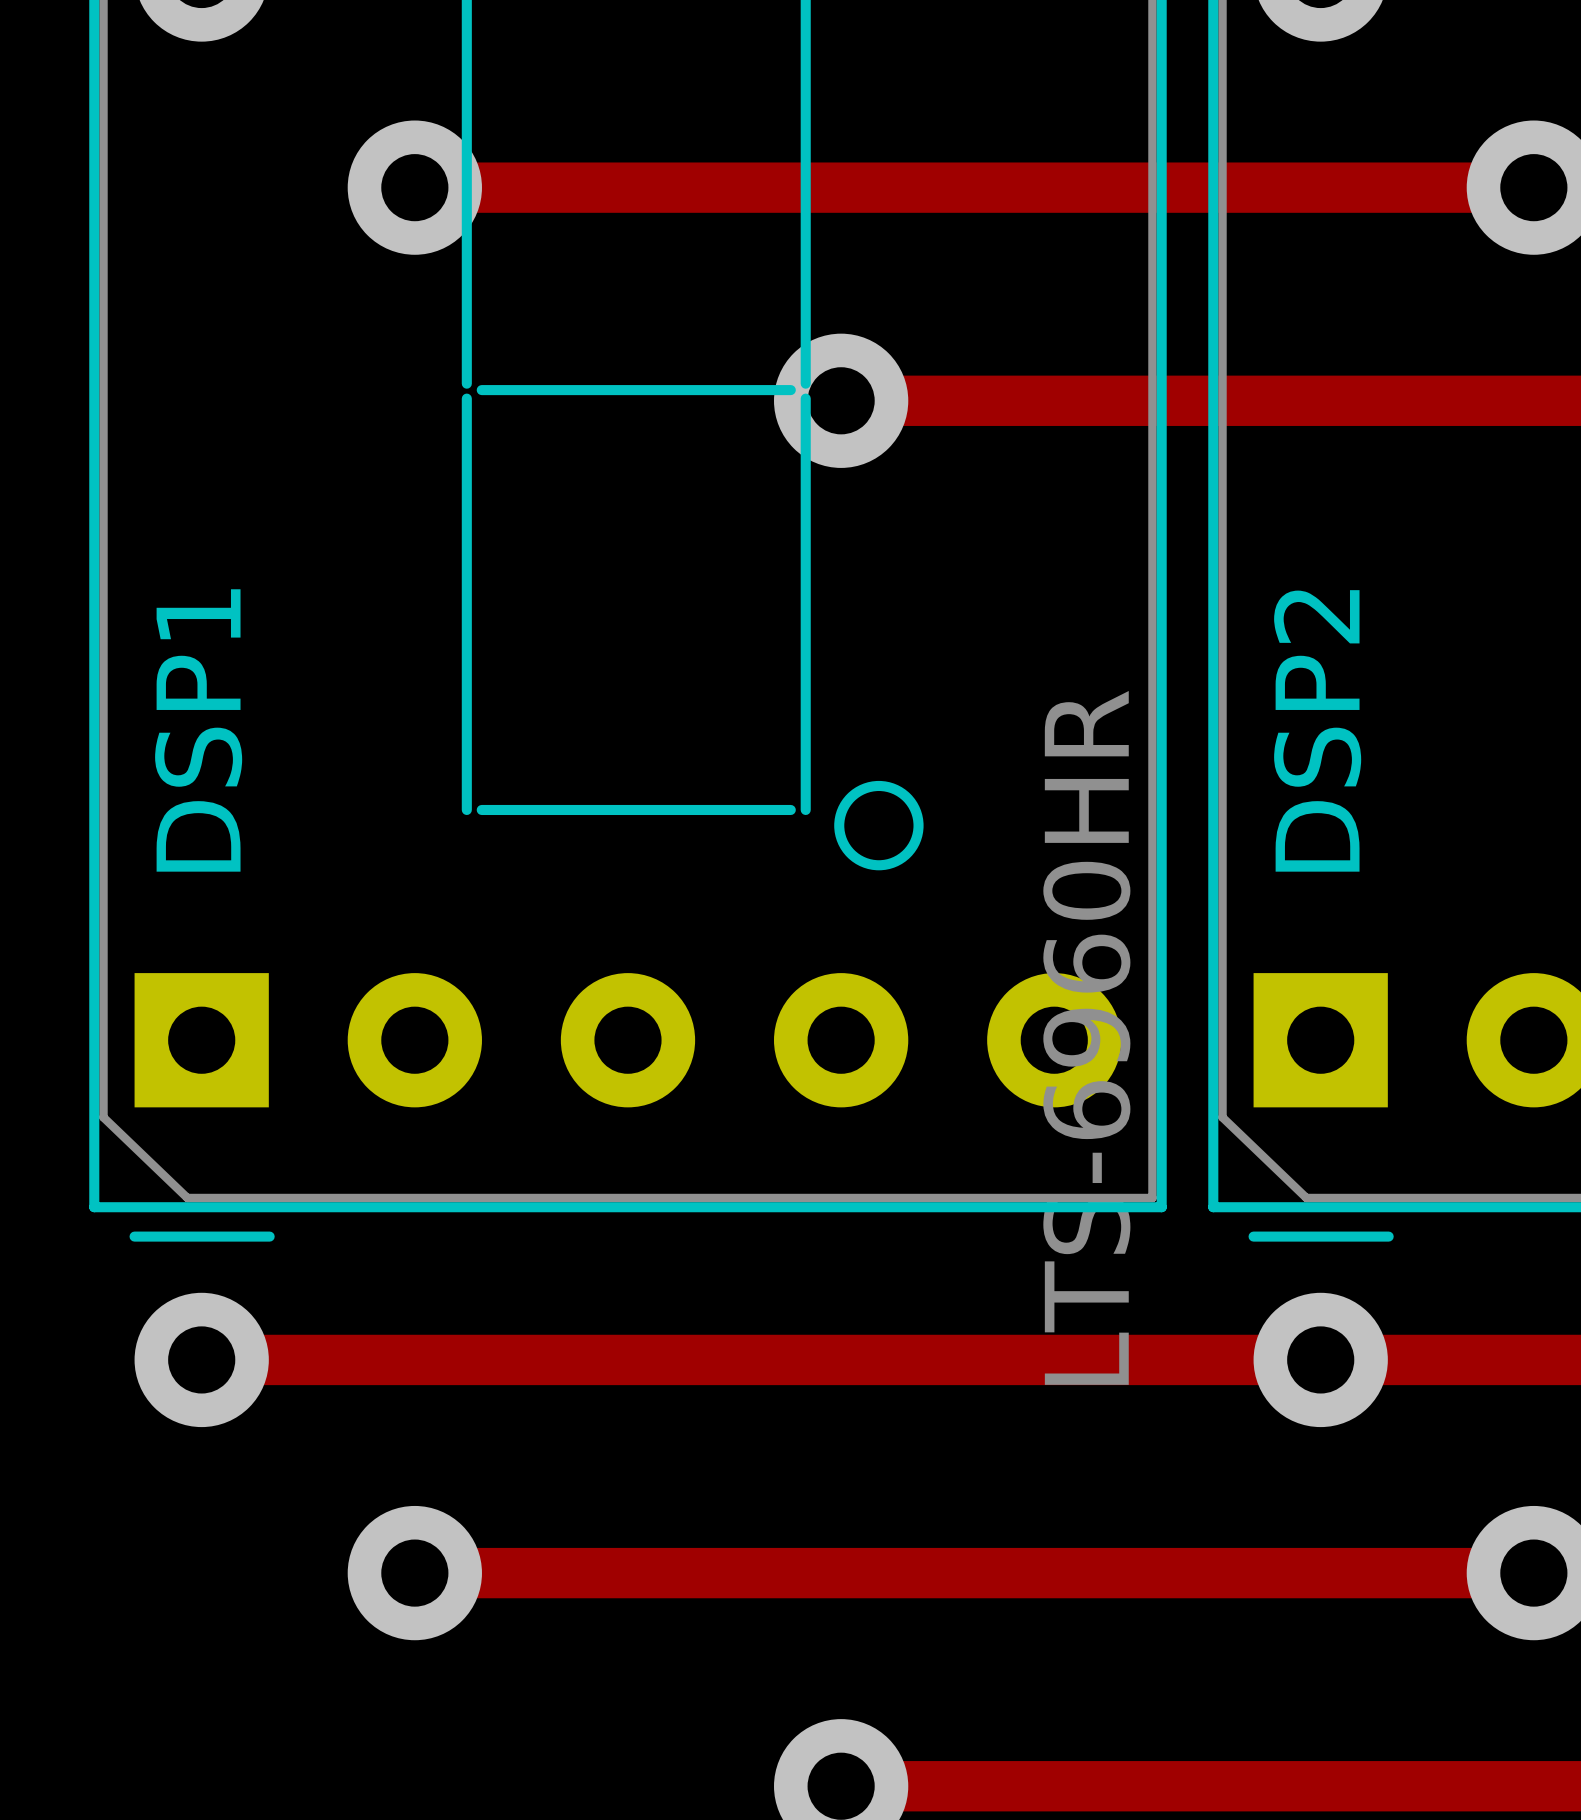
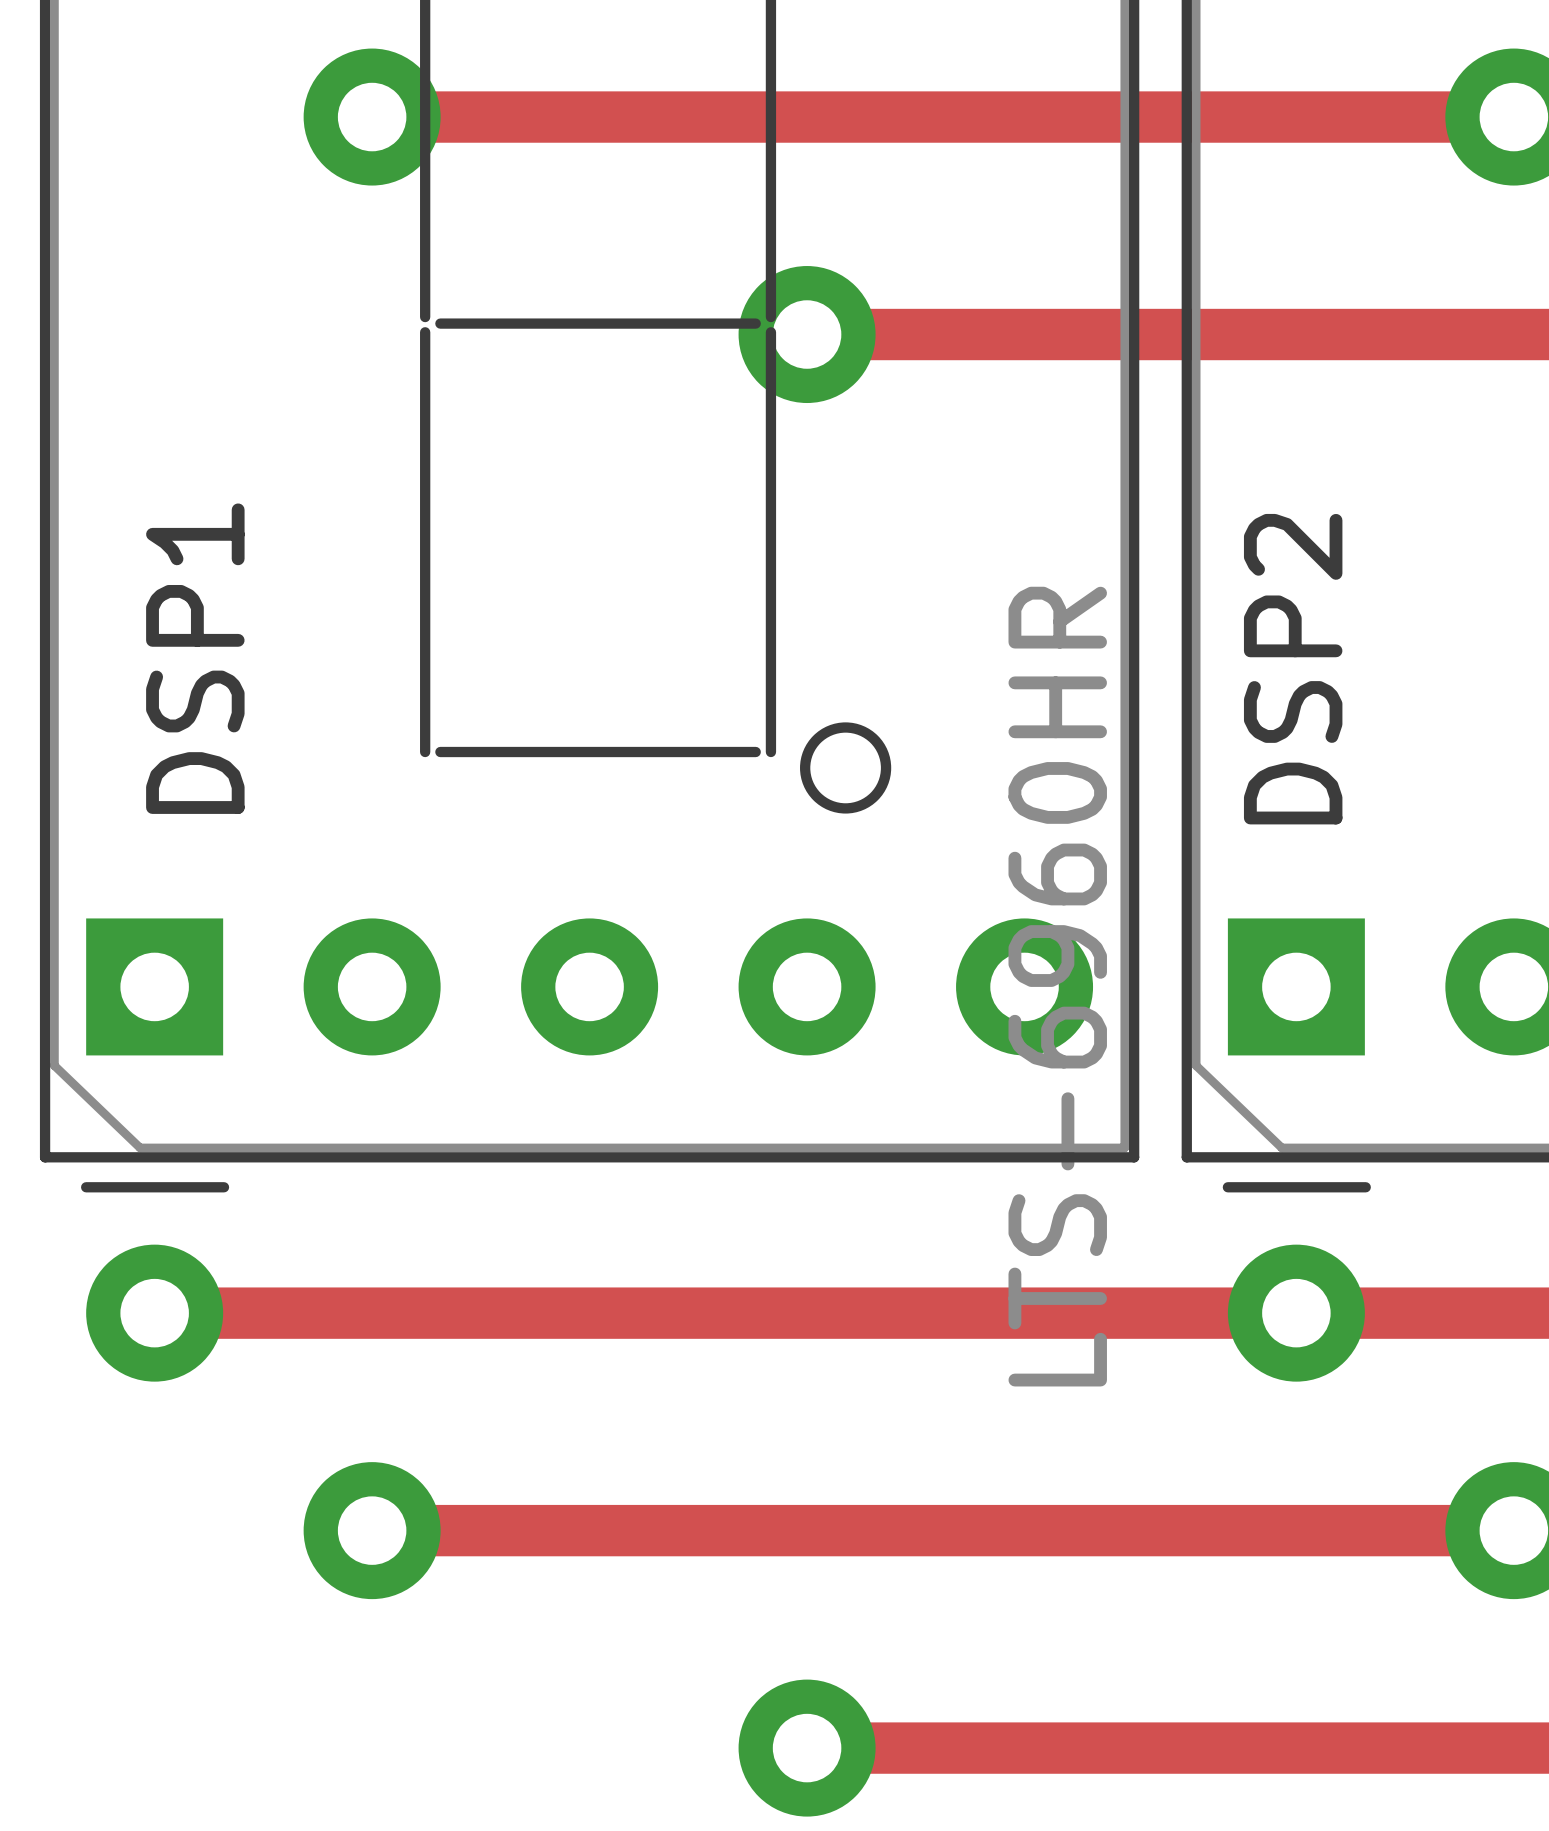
DSP1 name position: DSP1 (198, 730) -> DSP1 (195, 658)

